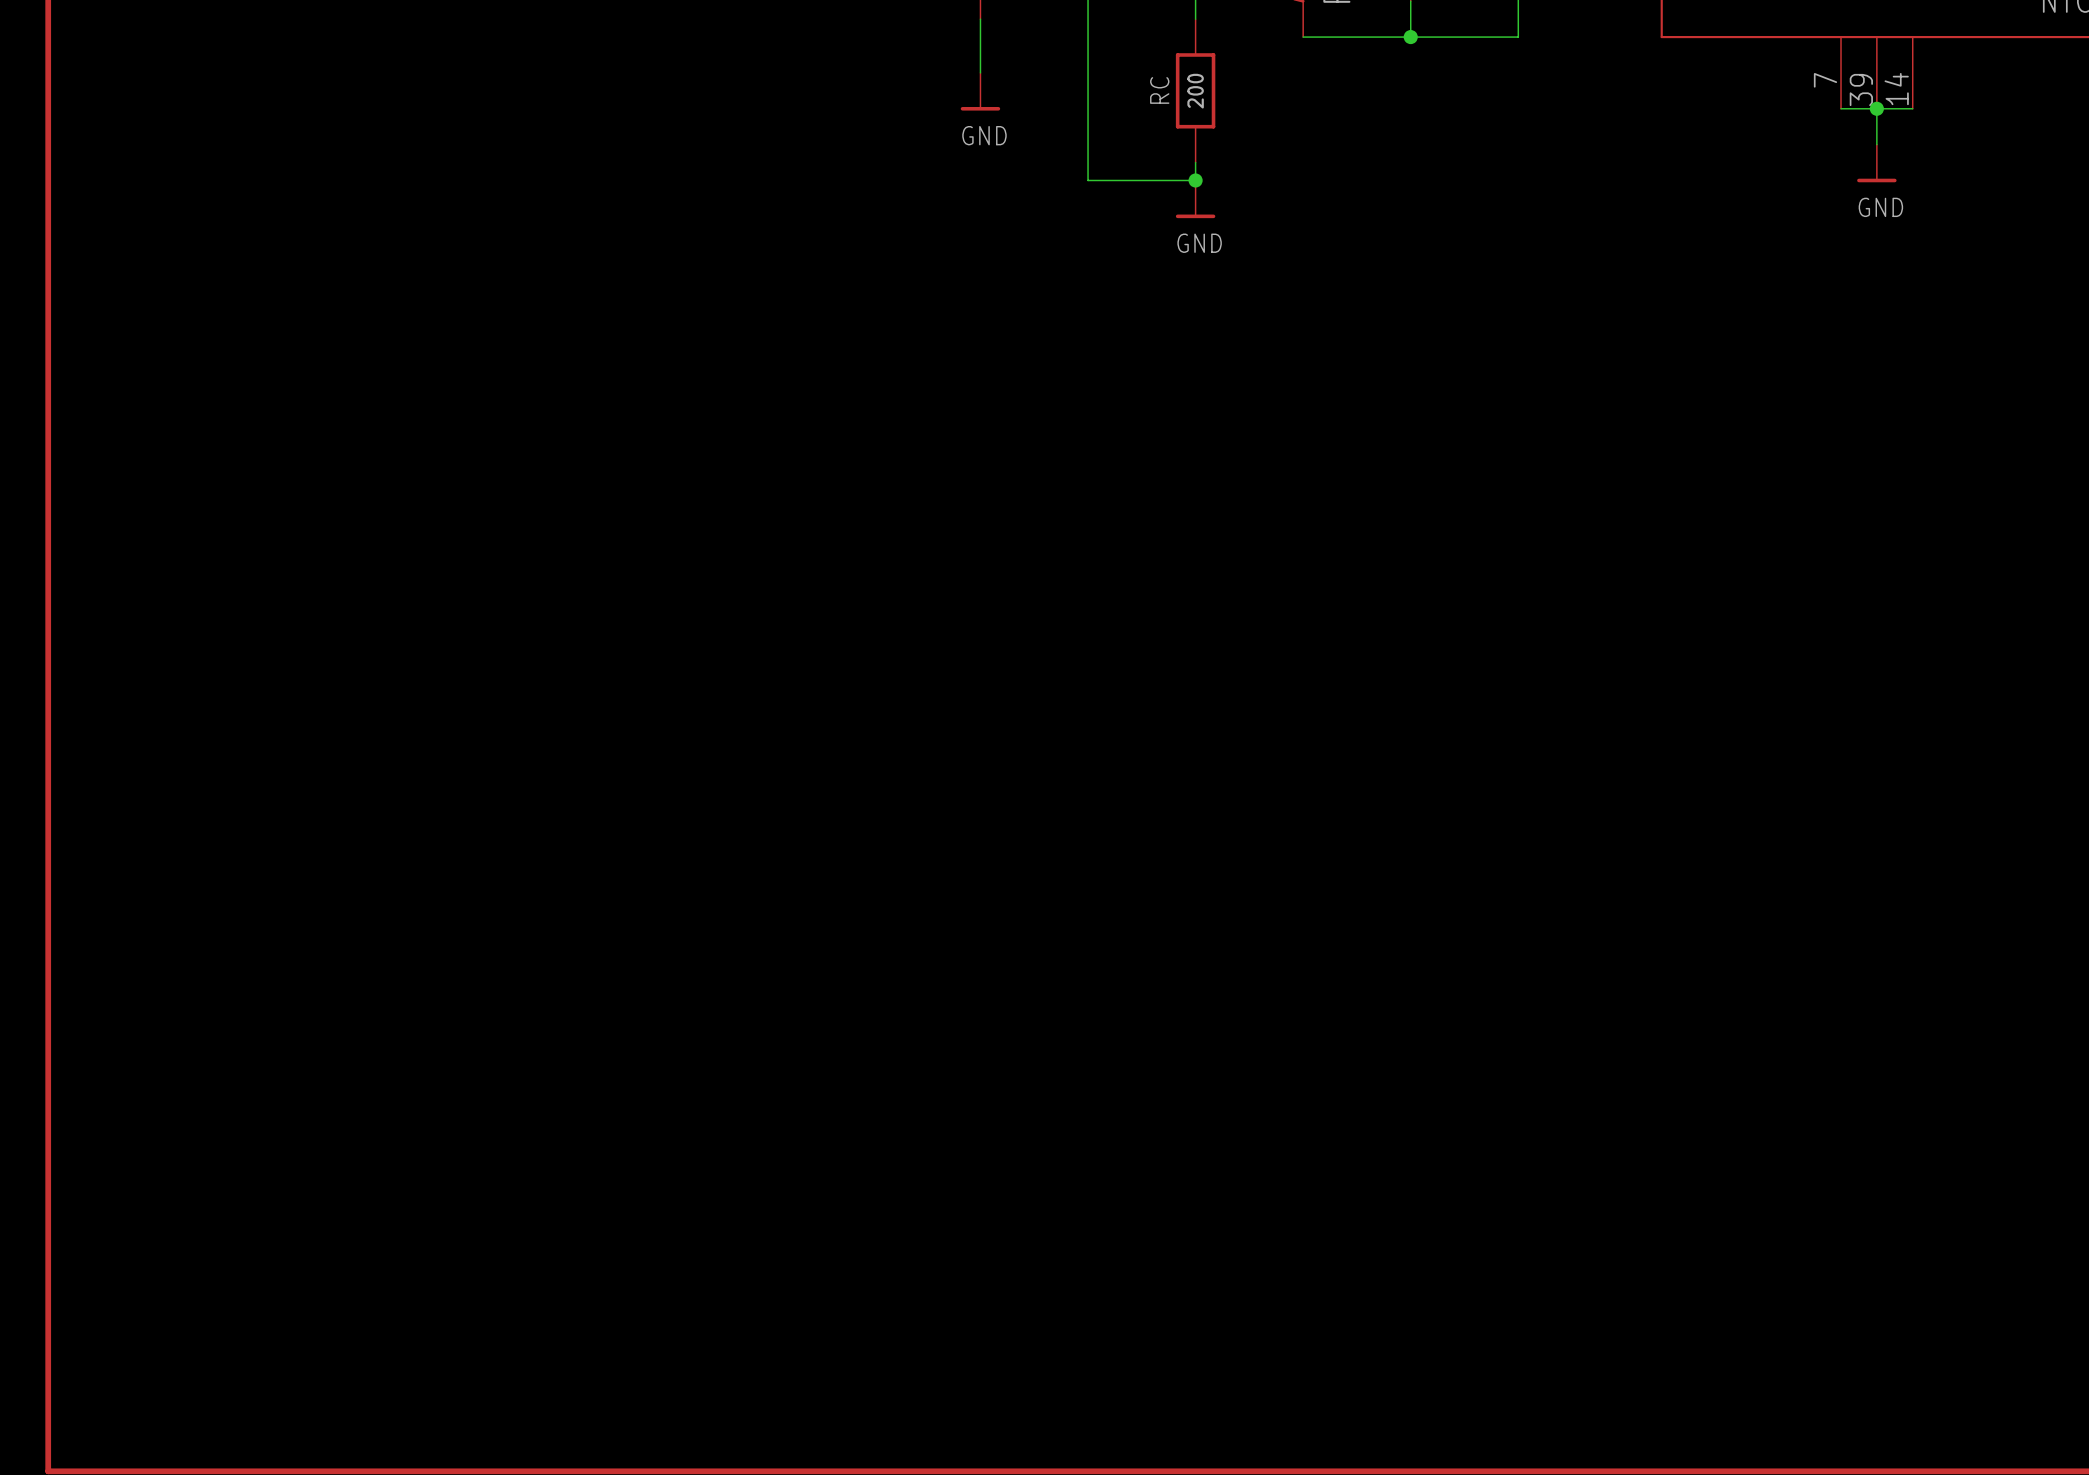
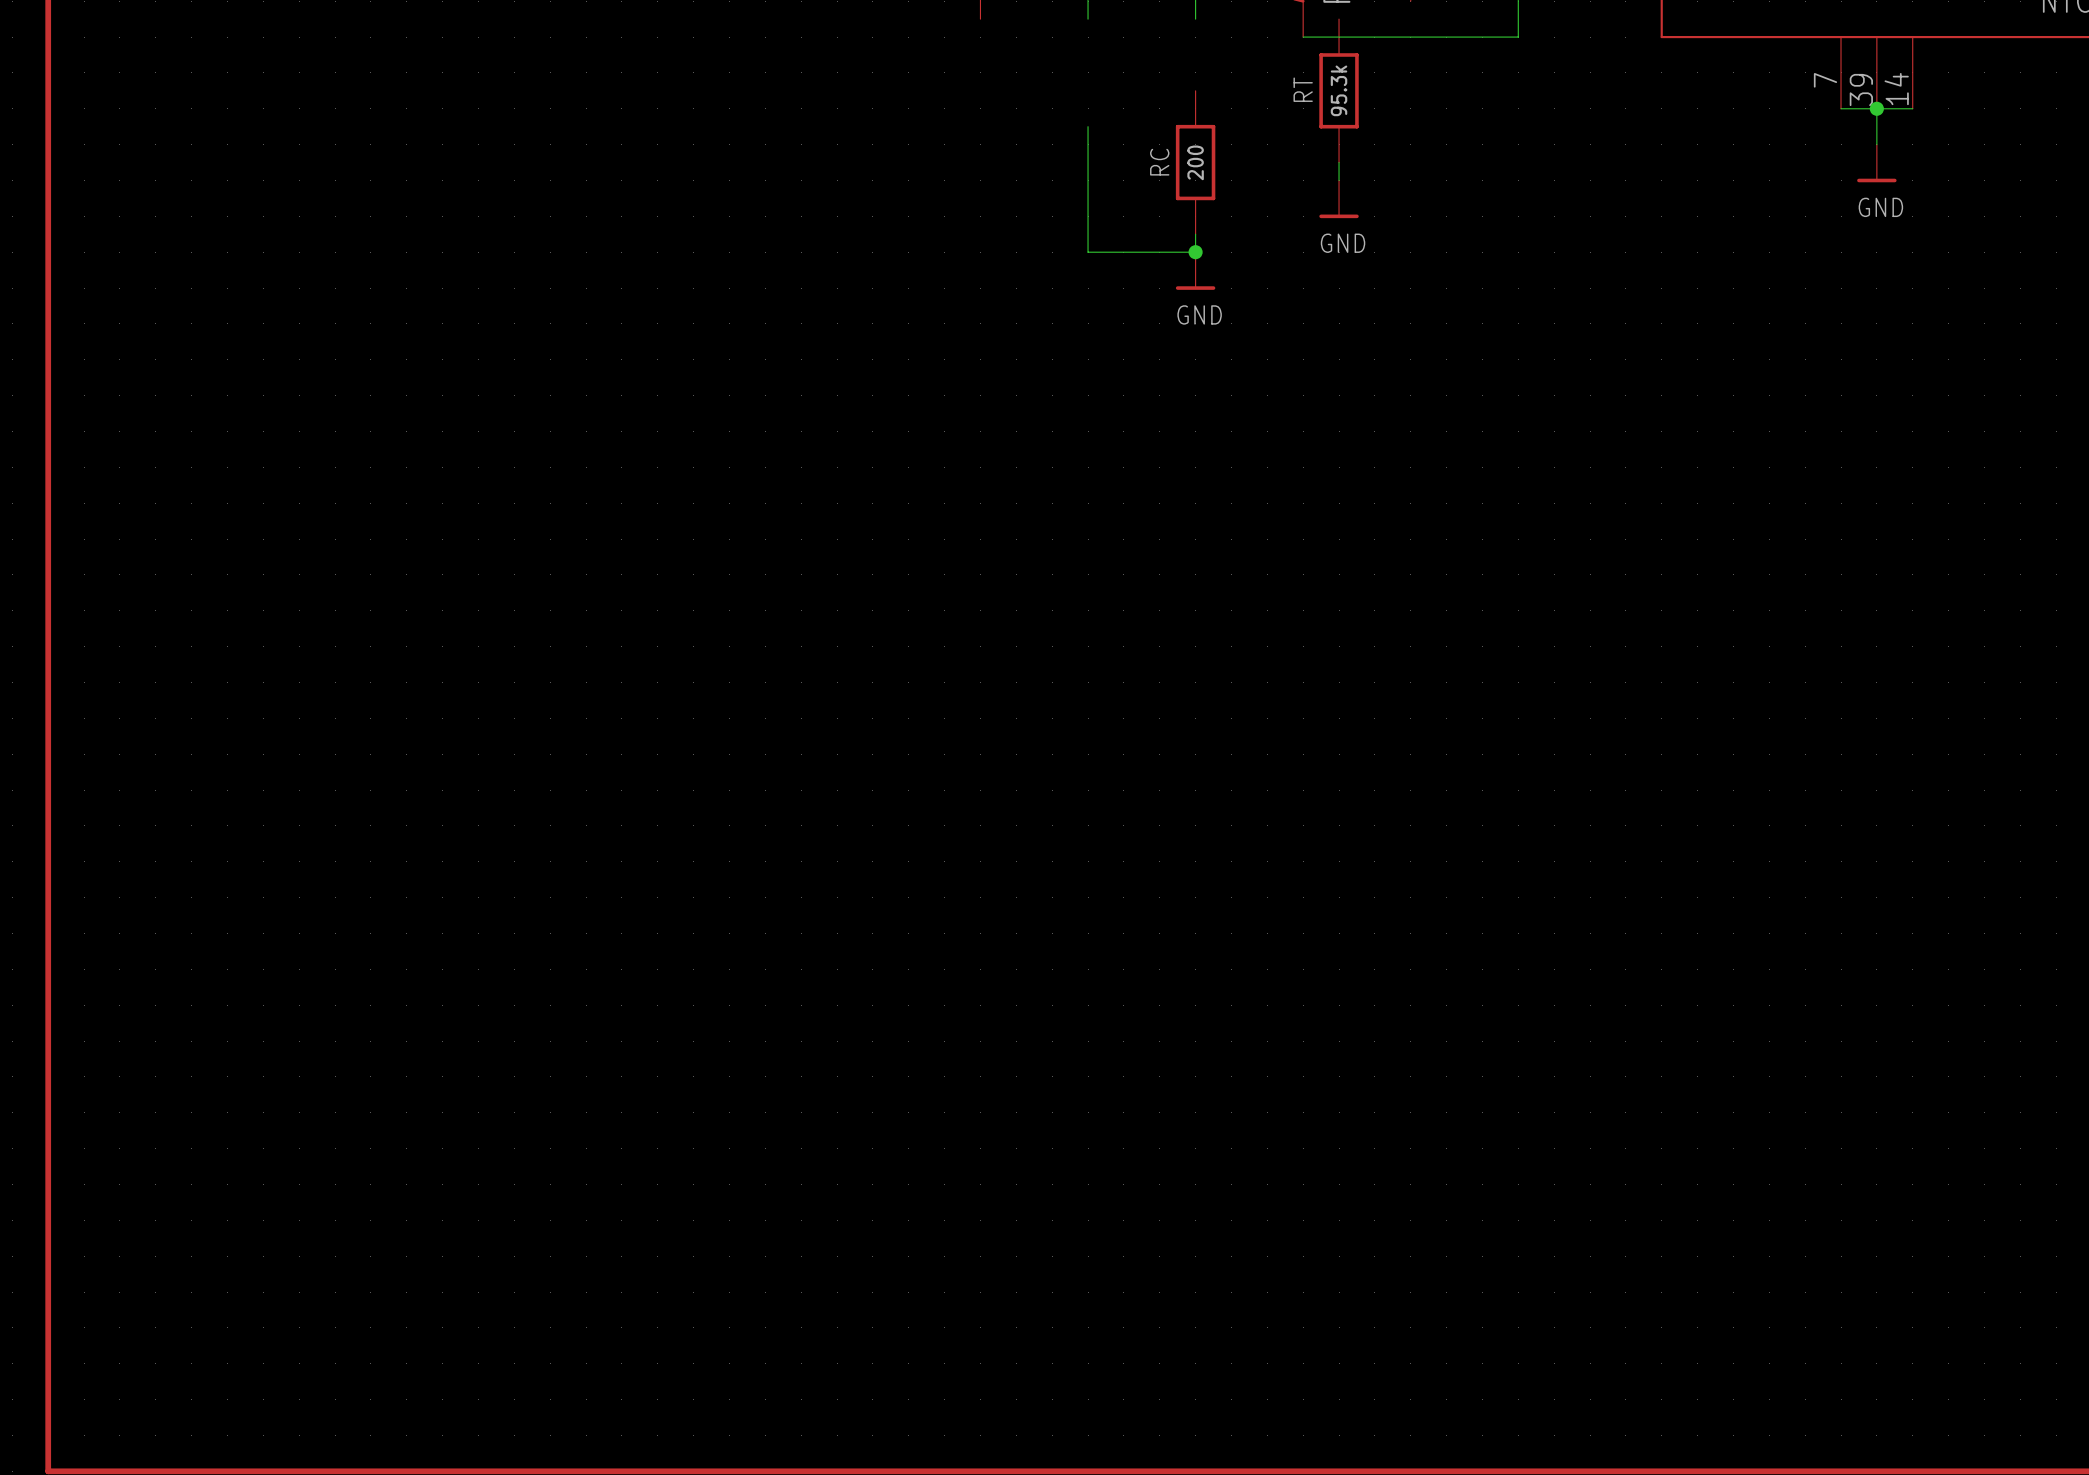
wire: (1410, 1) (1410, 37) -> none
wire: (980, 19) (980, 72) -> none
wire: (1088, 19) (1088, 126) -> none
junction: (1410, 37) -> none
RC position: (1195, 90) -> (1195, 162)
RT: none -> 95.3k (1339, 90)
power symbol: GND (980, 91) -> none
wire: (1195, 162) (1195, 180) (1088, 180) -> (1195, 234) (1195, 252) (1088, 252) (1088, 180)
wire: none -> (1339, 162) (1339, 180)
junction position: (1195, 180) -> (1195, 252)
power symbol: GND (1195, 199) -> none
power symbol: none -> GND (1339, 199)
power symbol: none -> GND (1195, 271)

